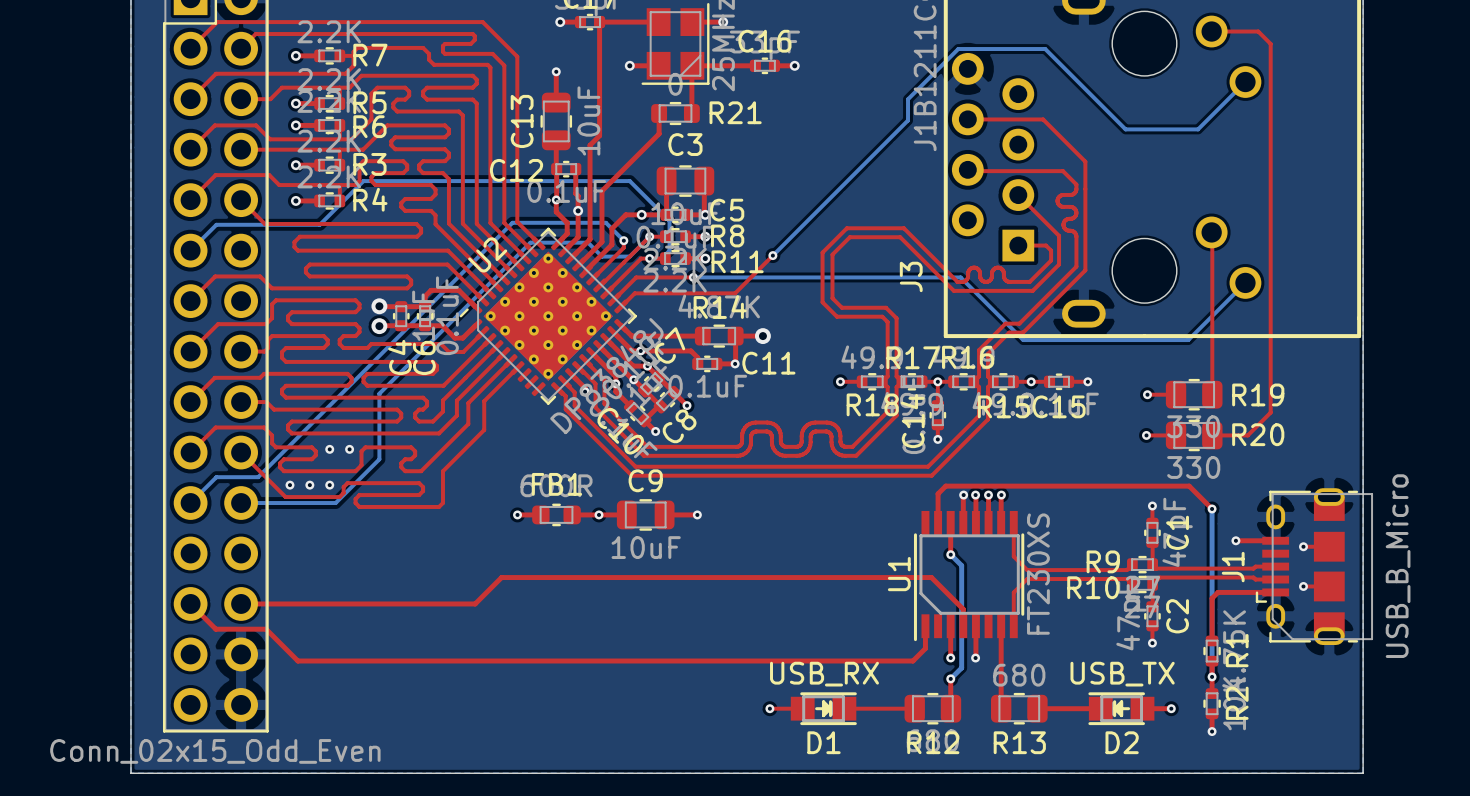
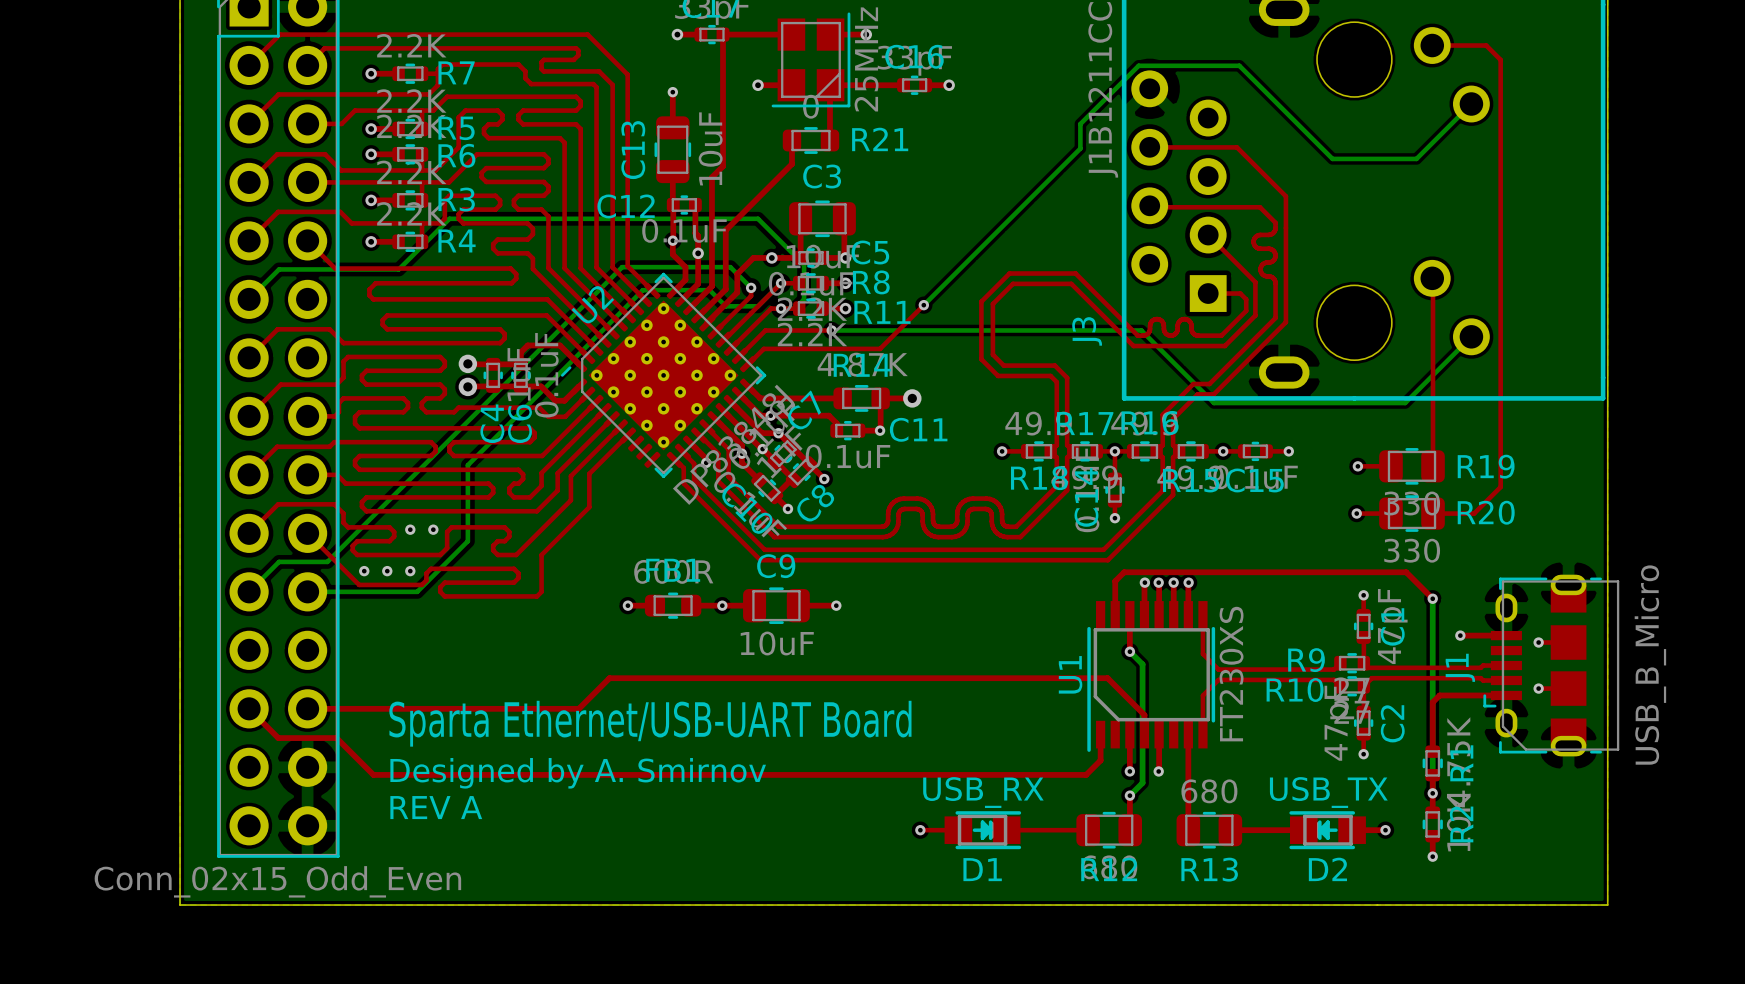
text: none -> Sparta Ethernet/USB-UART Board (650, 723)
text: none -> Designed by A. Smirnov (578, 773)
text: none -> REV A (436, 807)

